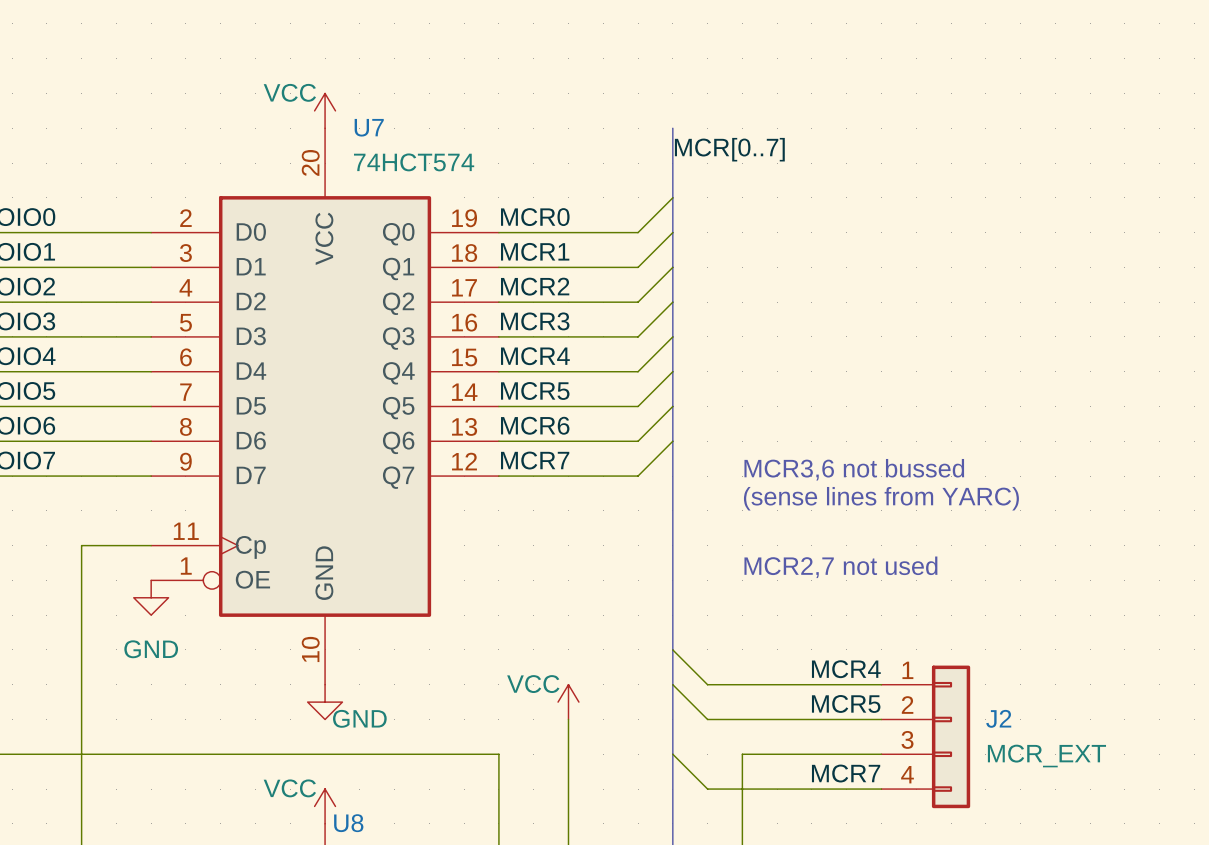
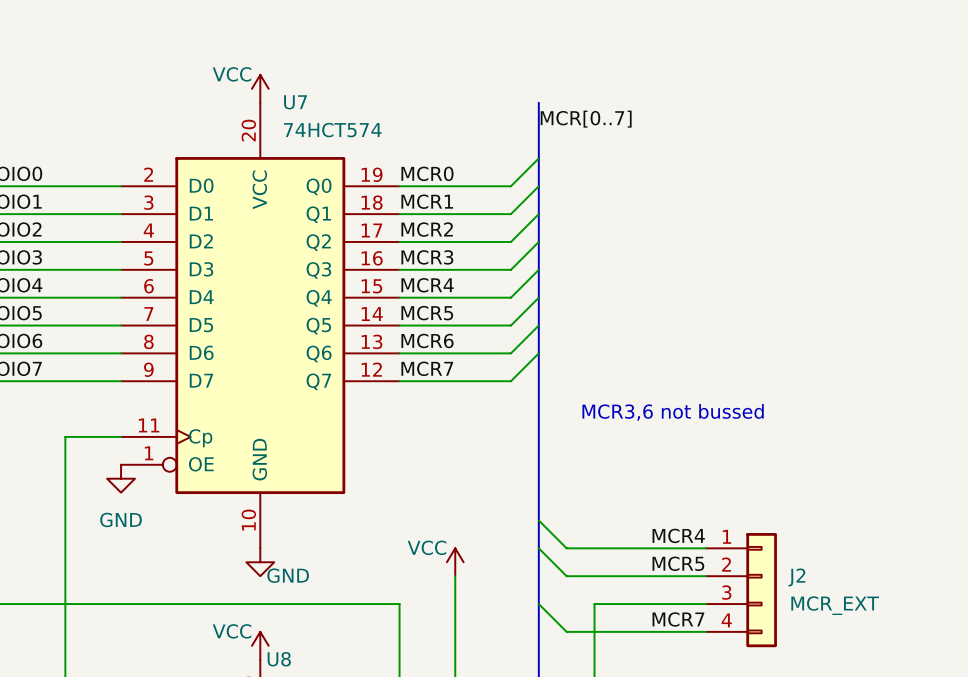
text position: MCR3,6 not bussed (854, 469) -> MCR3,6 not bussed (673, 412)
text: (sense lines from YARC) (881, 498) -> none
text: MCR2,7 not used (840, 567) -> none

